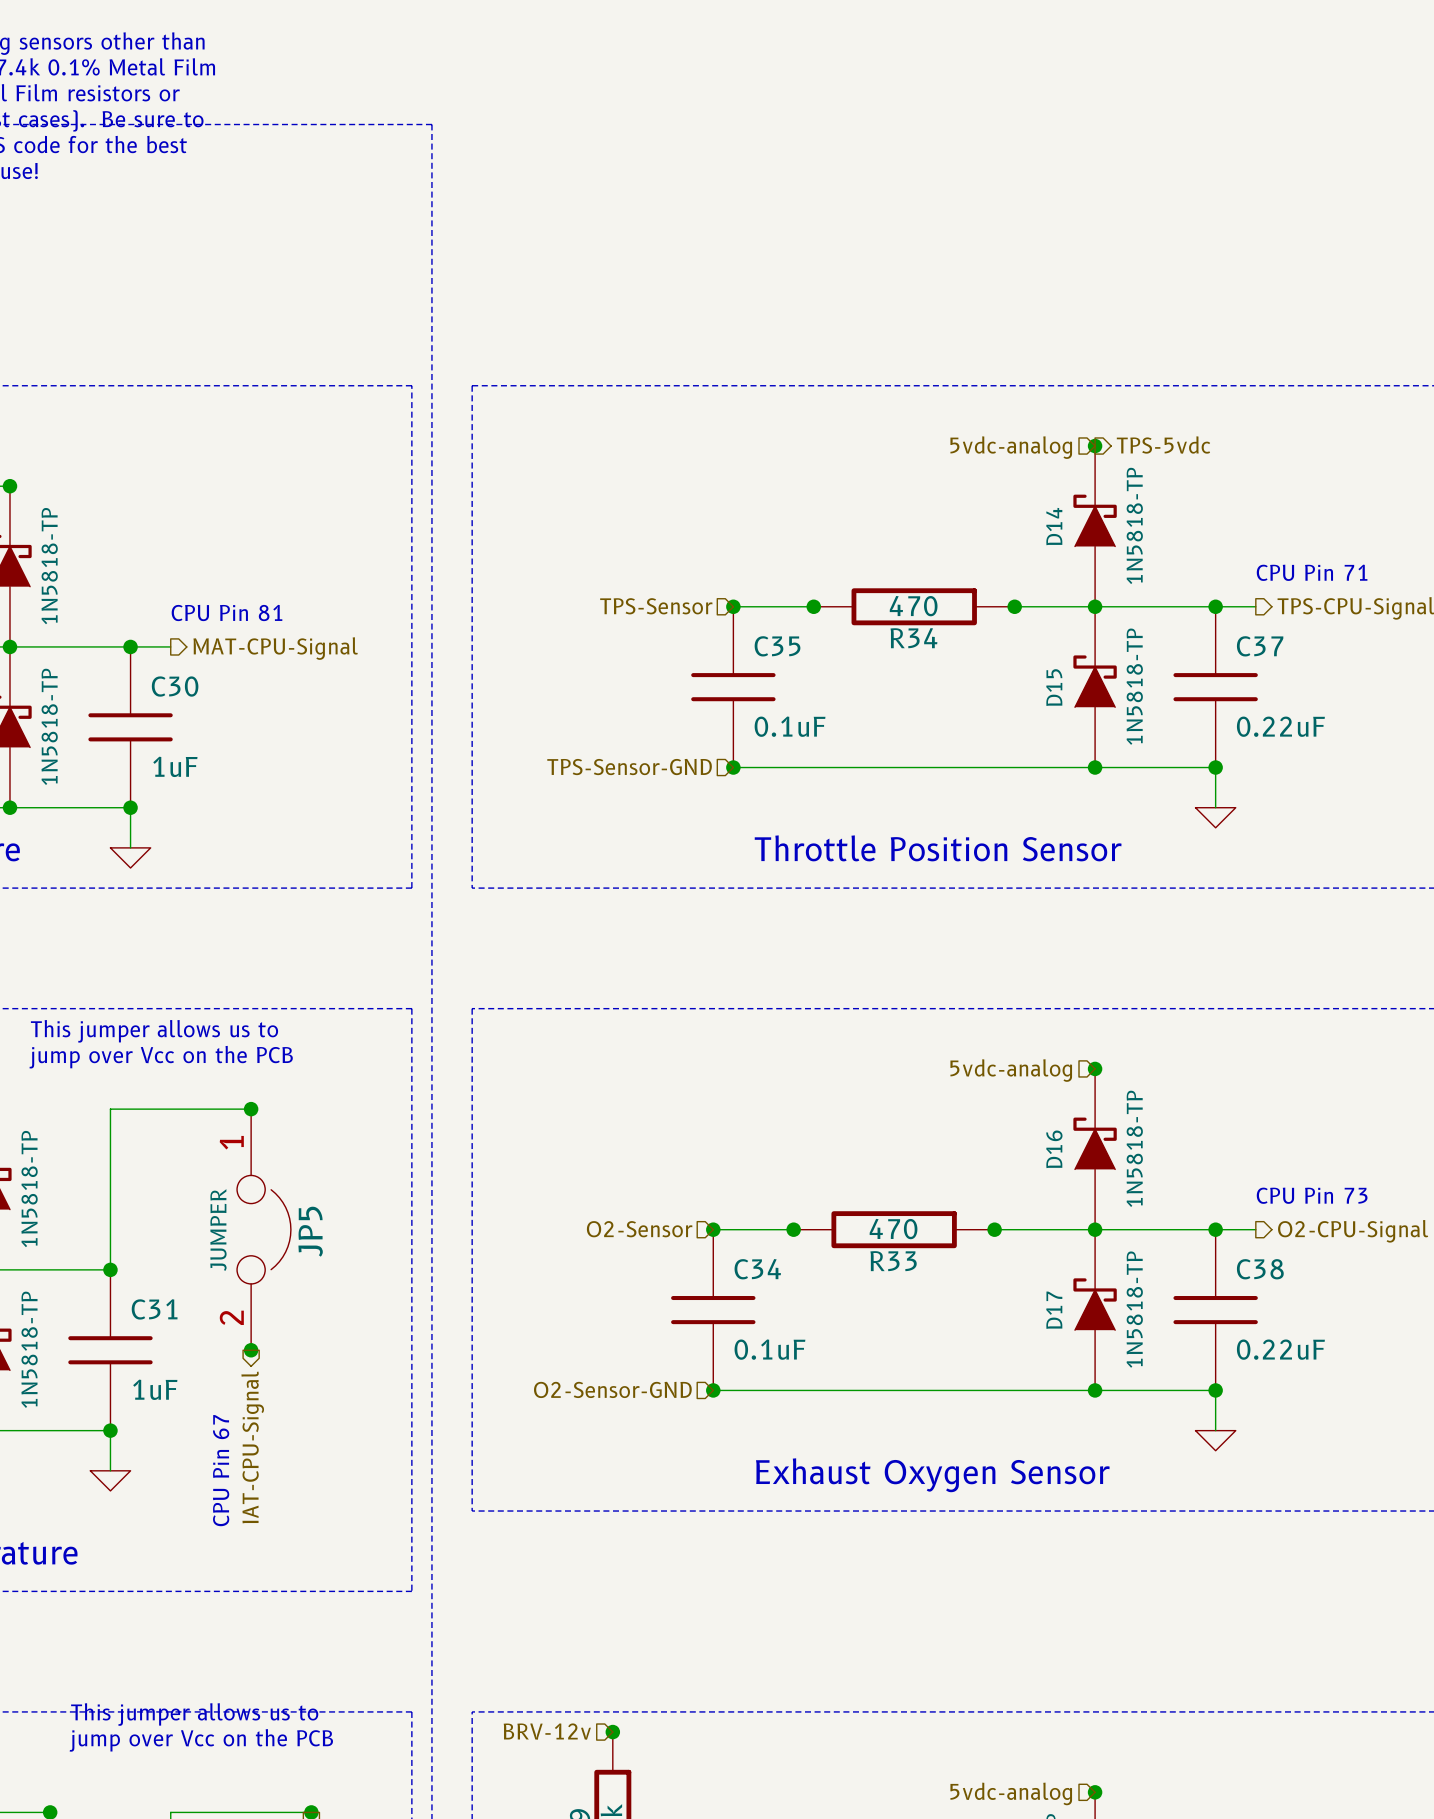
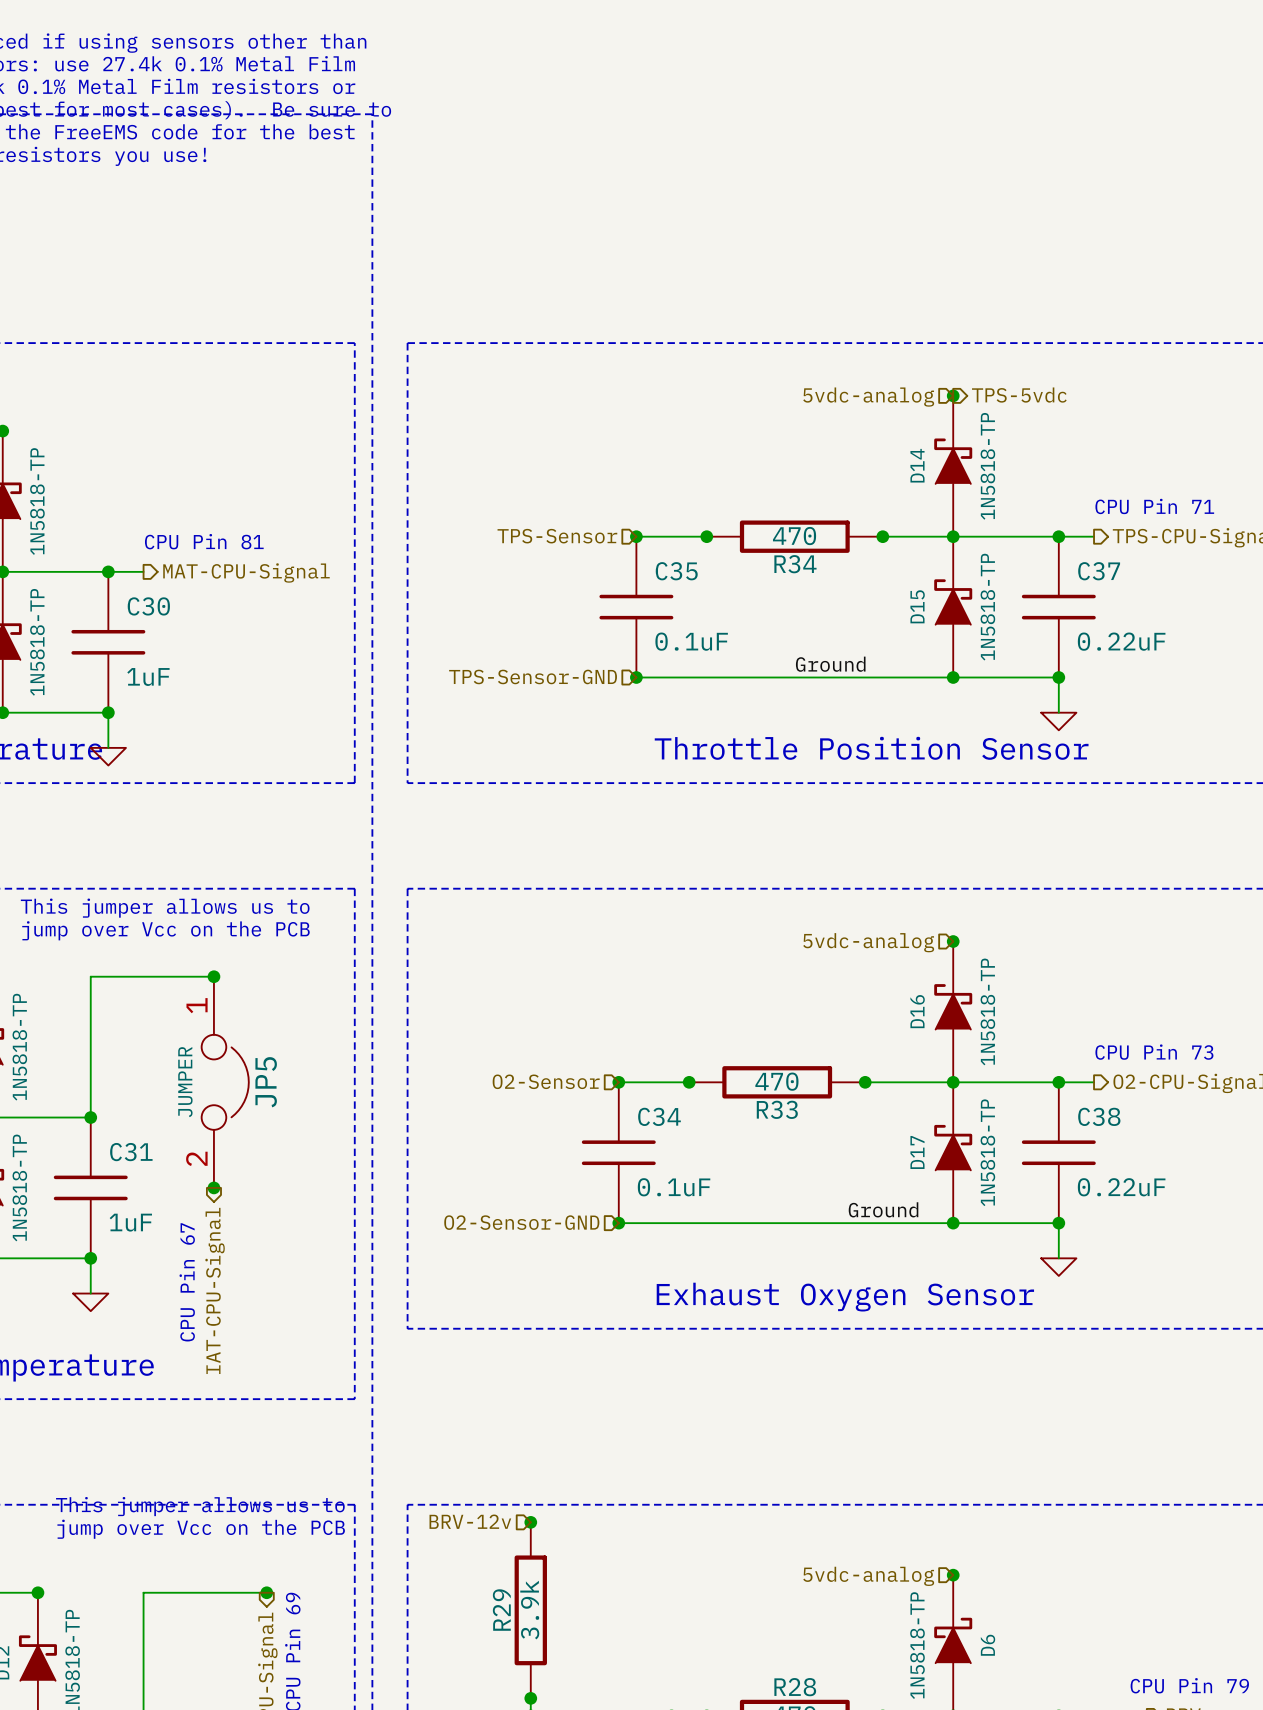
label: none -> Ground (830, 664)
label: none -> Ground (883, 1209)

